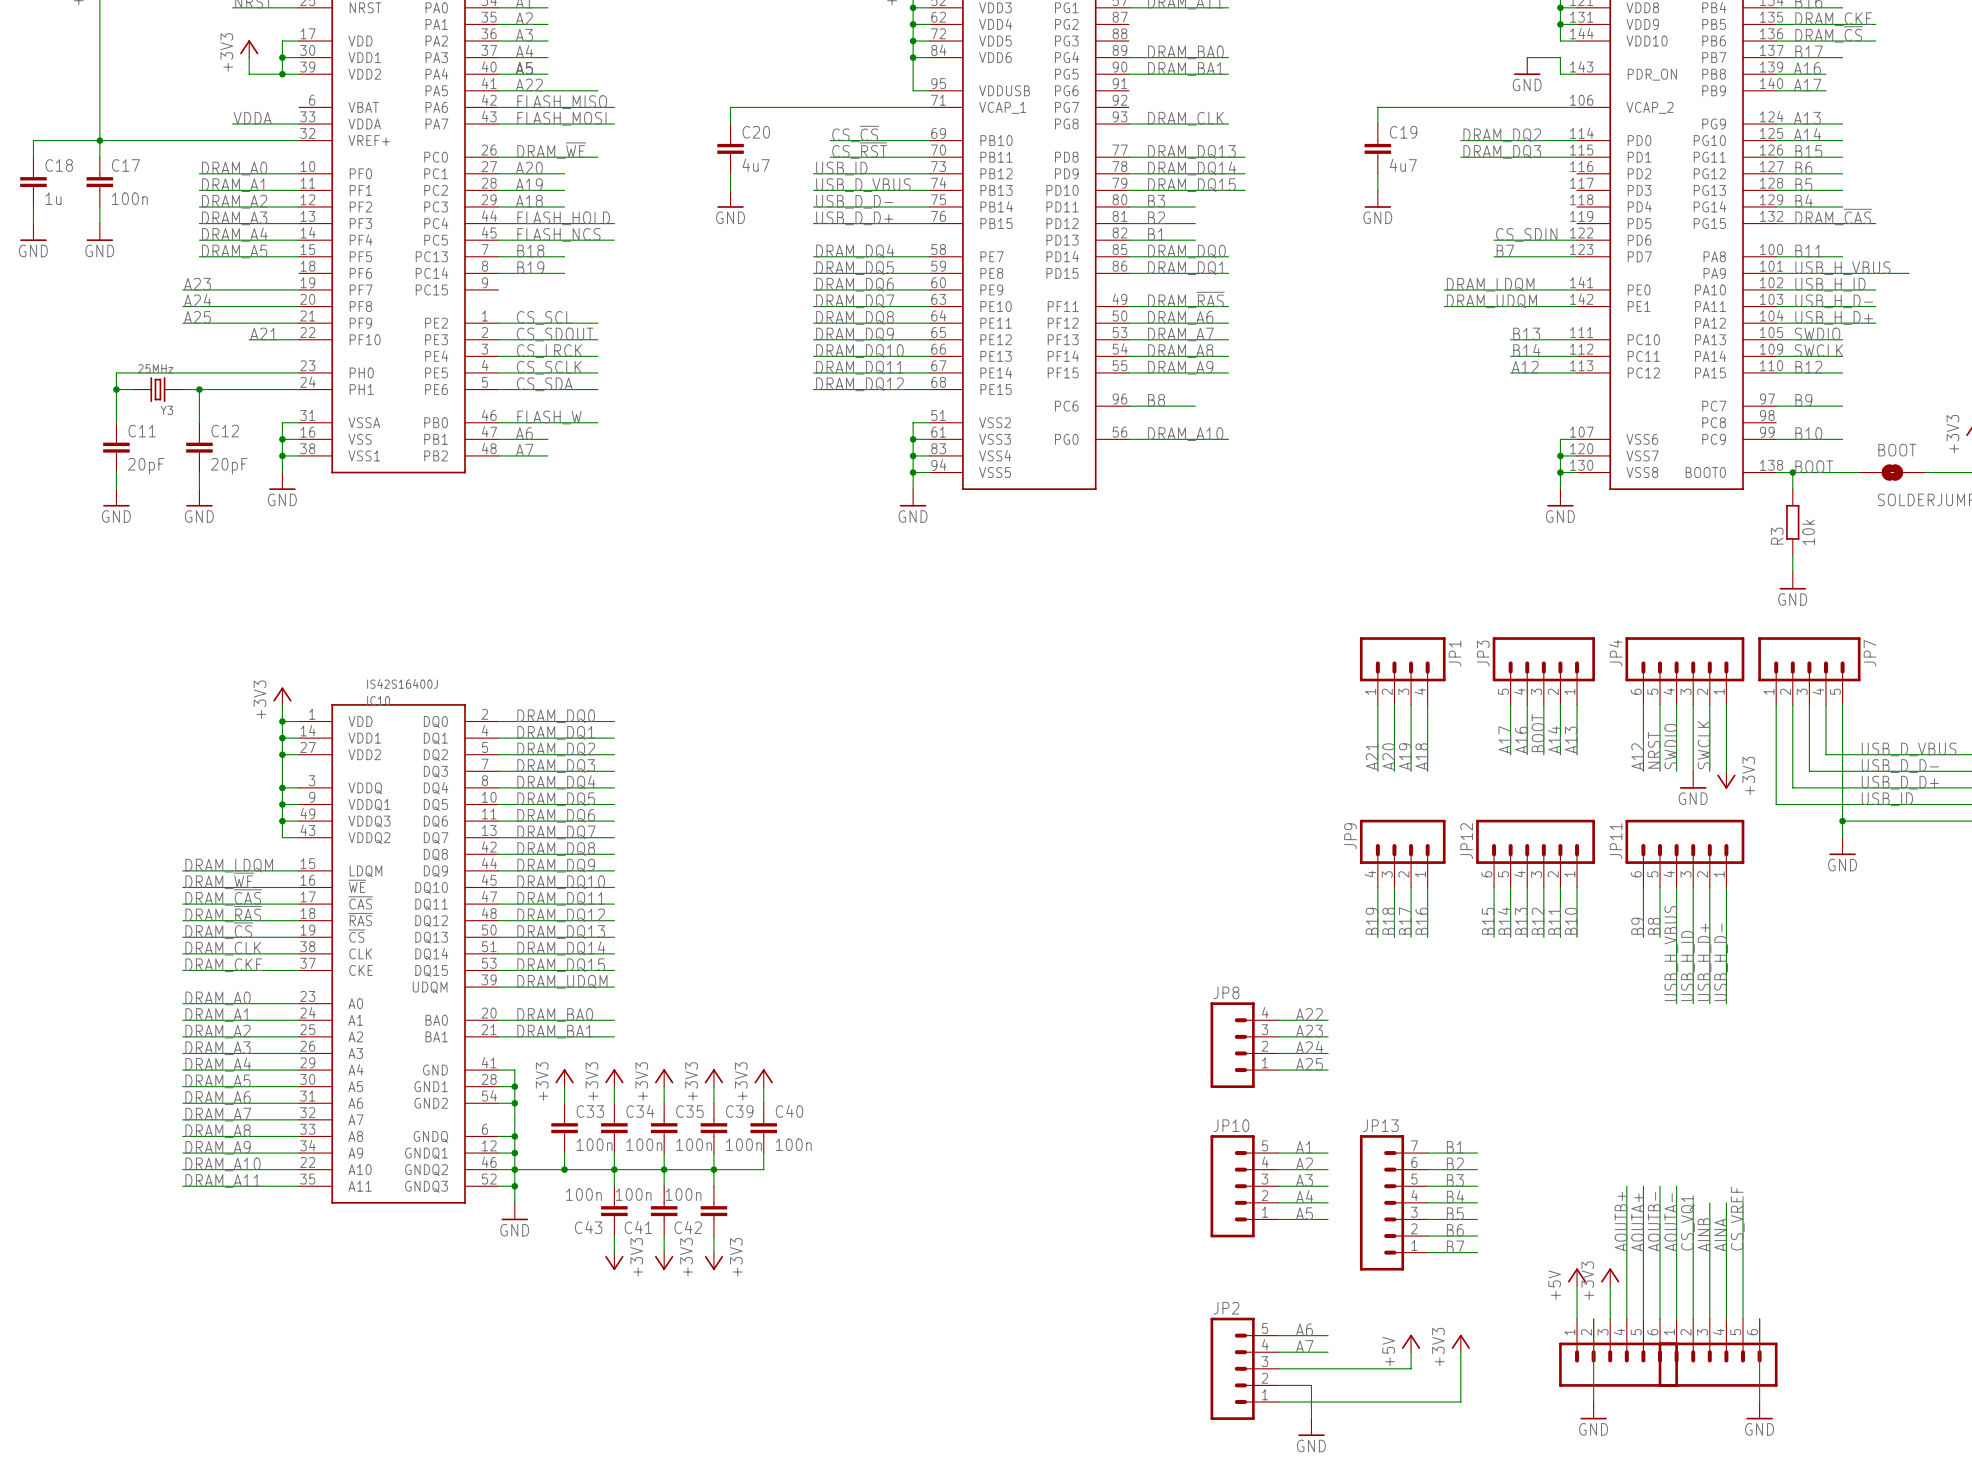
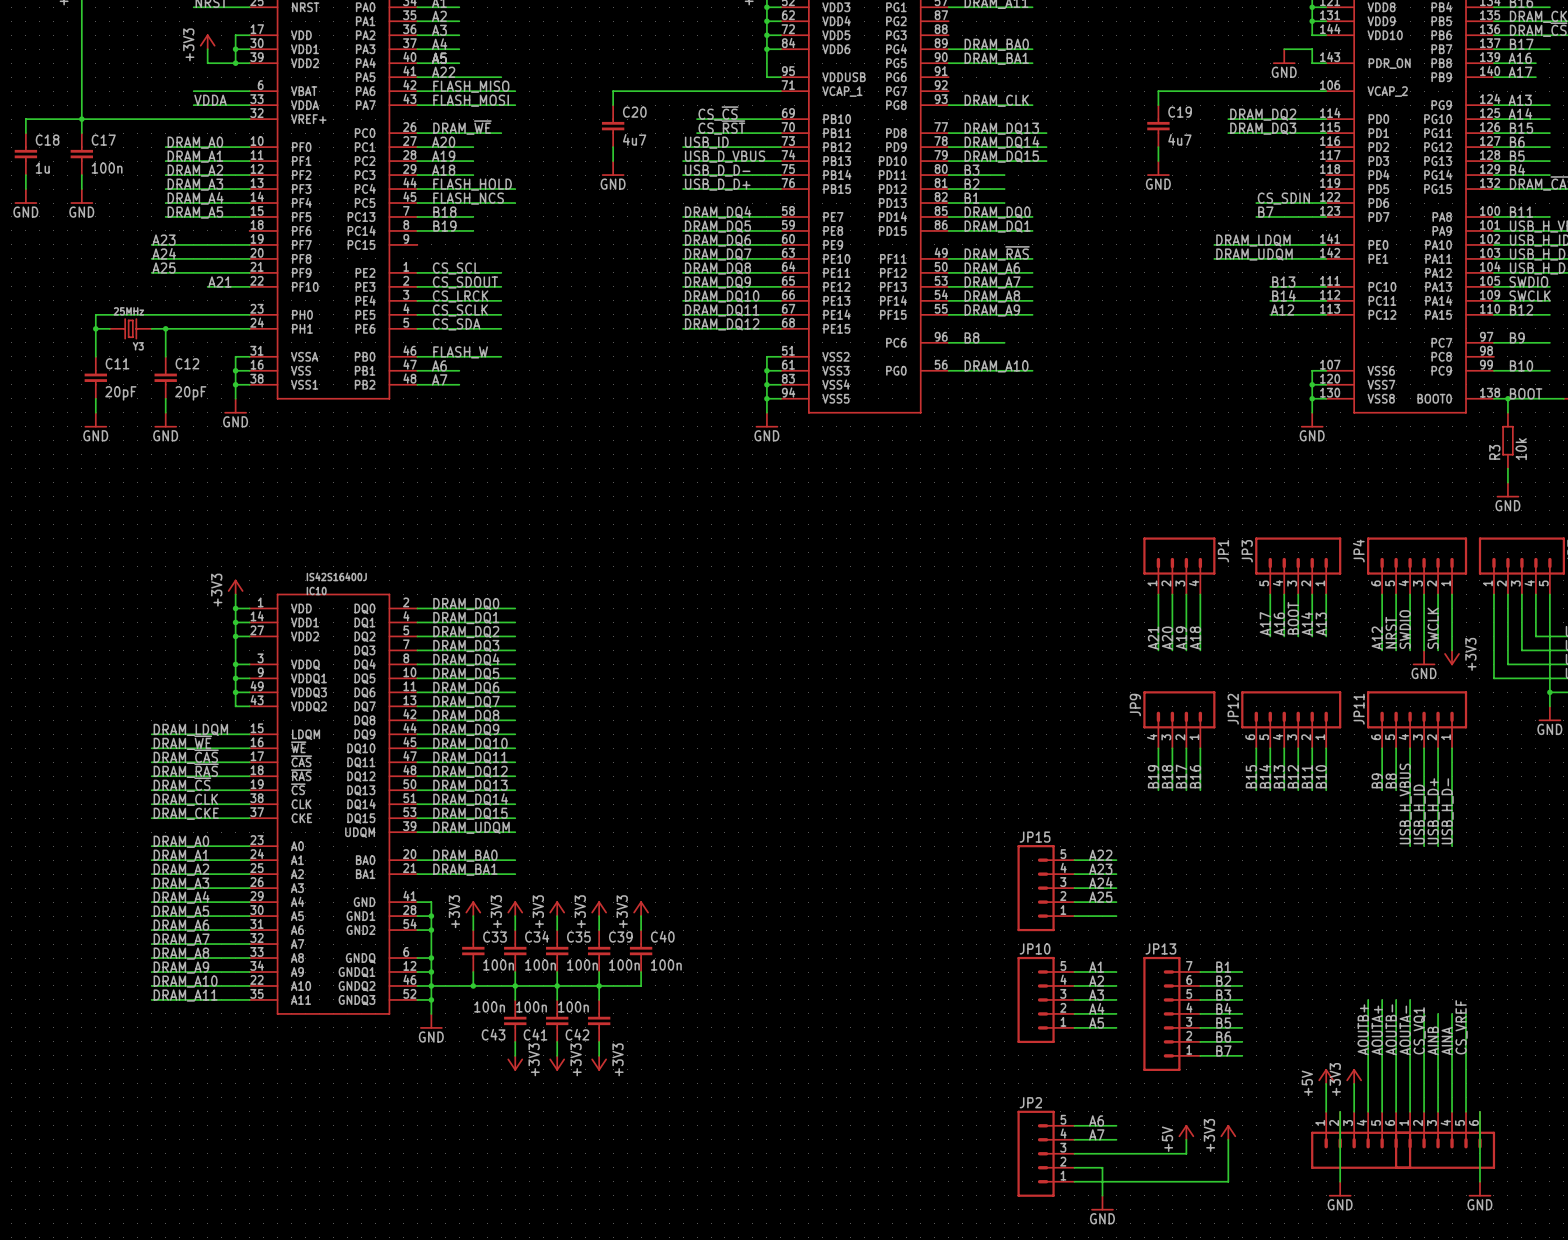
wire: none -> (193, 91) (249, 91)
JP8: (1244, 1045) -> none
JP15: none -> (1046, 888)
wire: none -> (1074, 916) (1116, 916)

